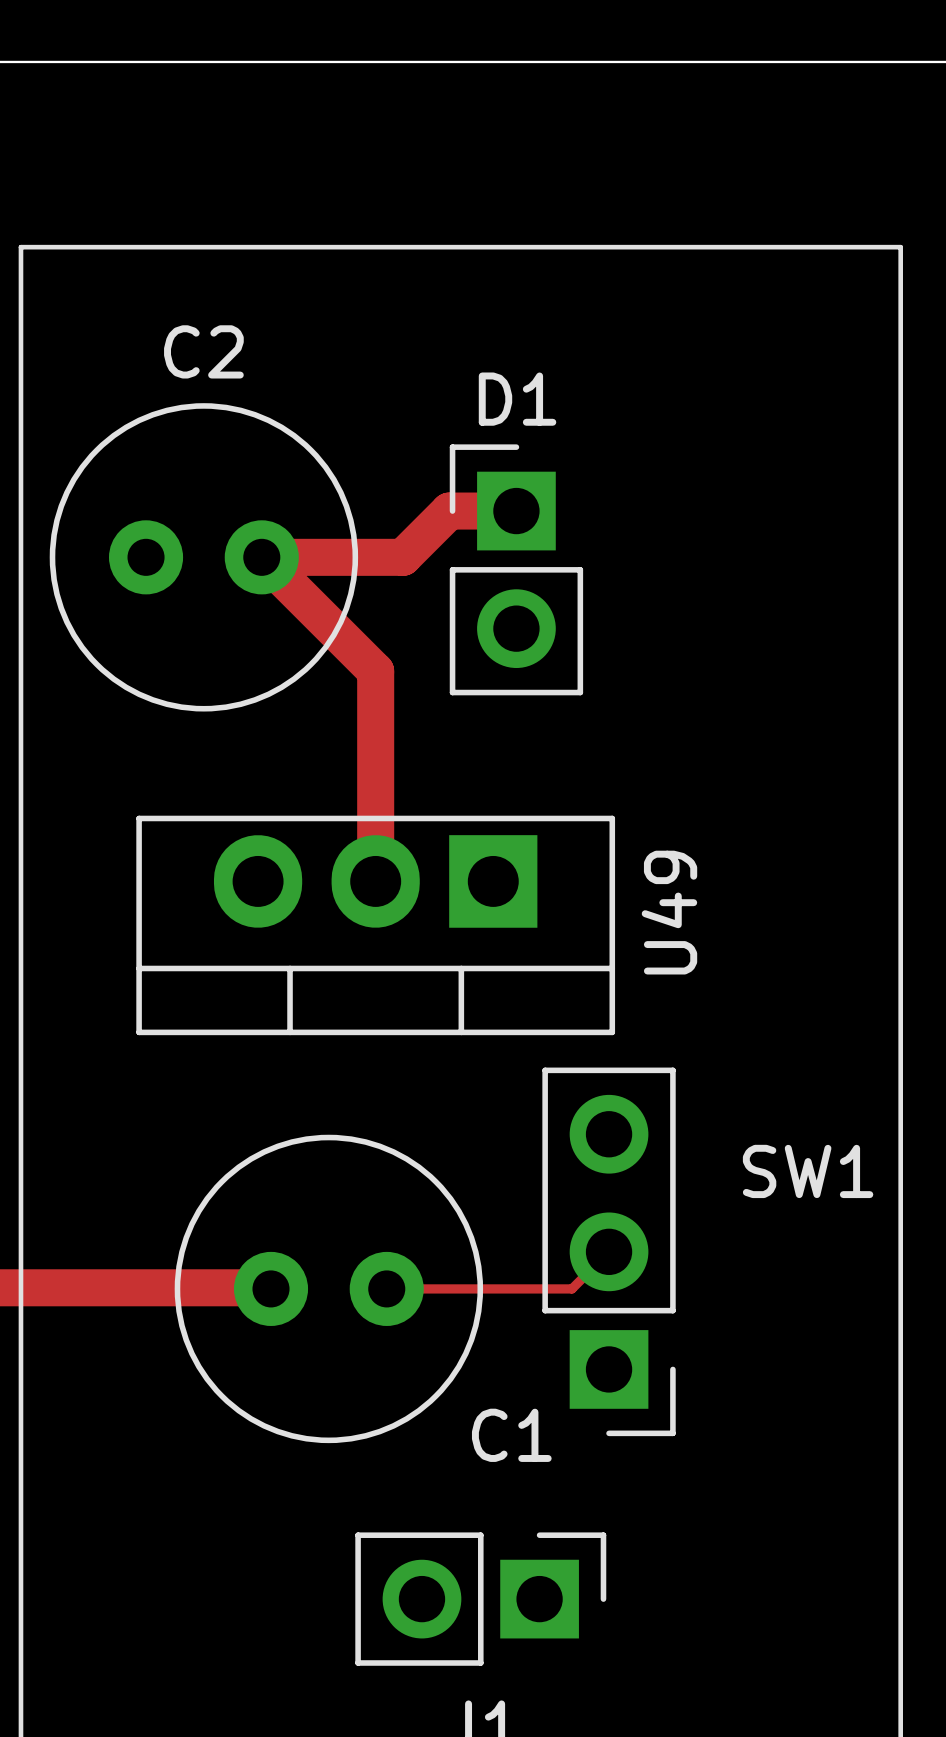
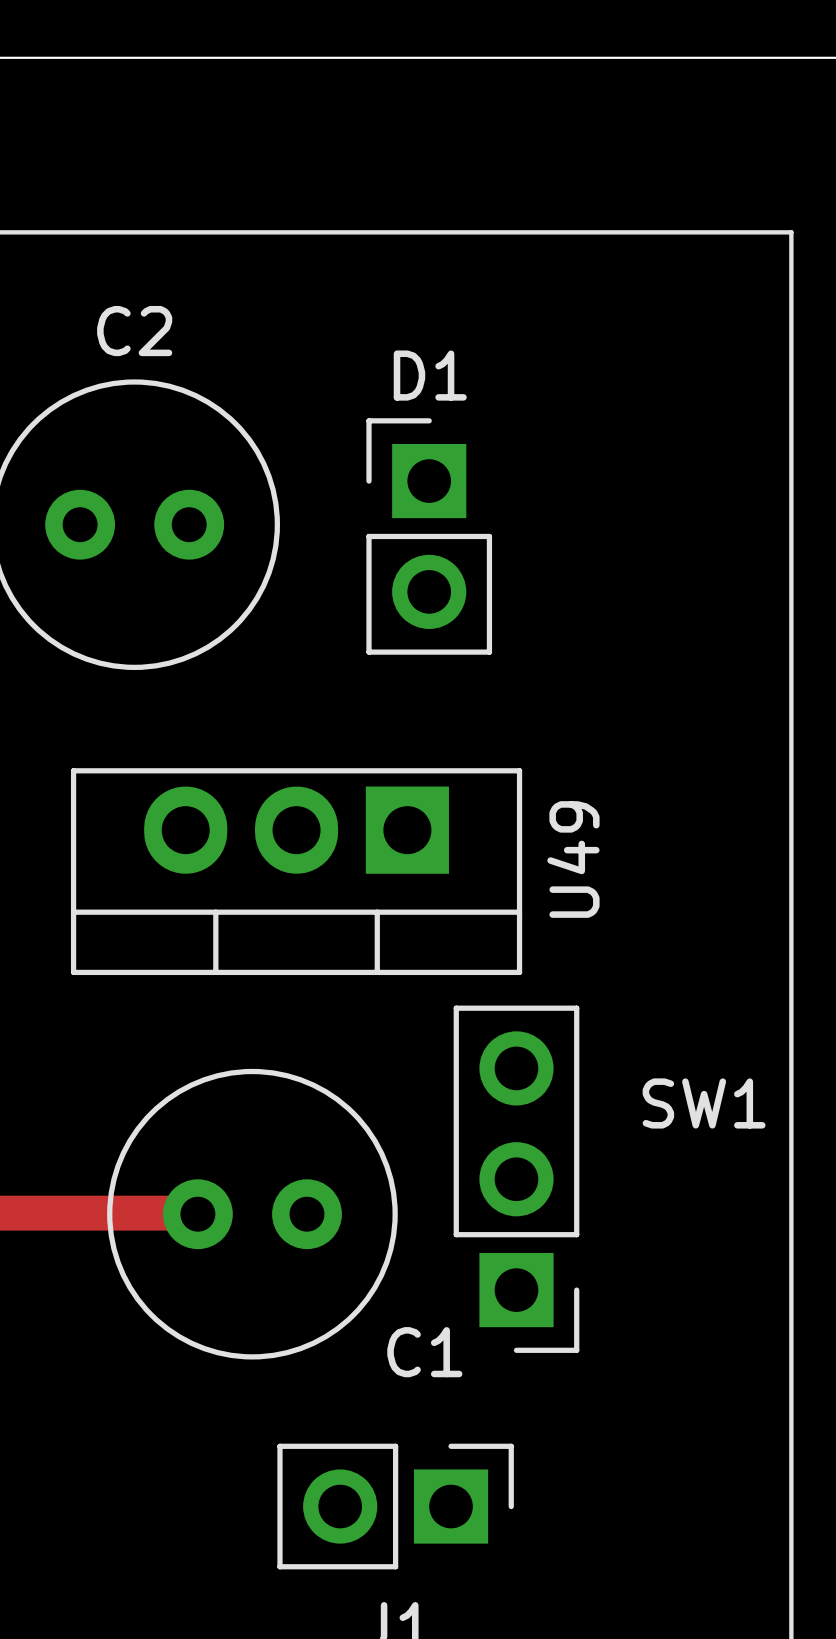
track: (516, 511) (449, 511) (402, 557) (261, 557) (375, 671) (375, 881) -> none
track: (609, 1251) (571, 1288) (386, 1288) -> none

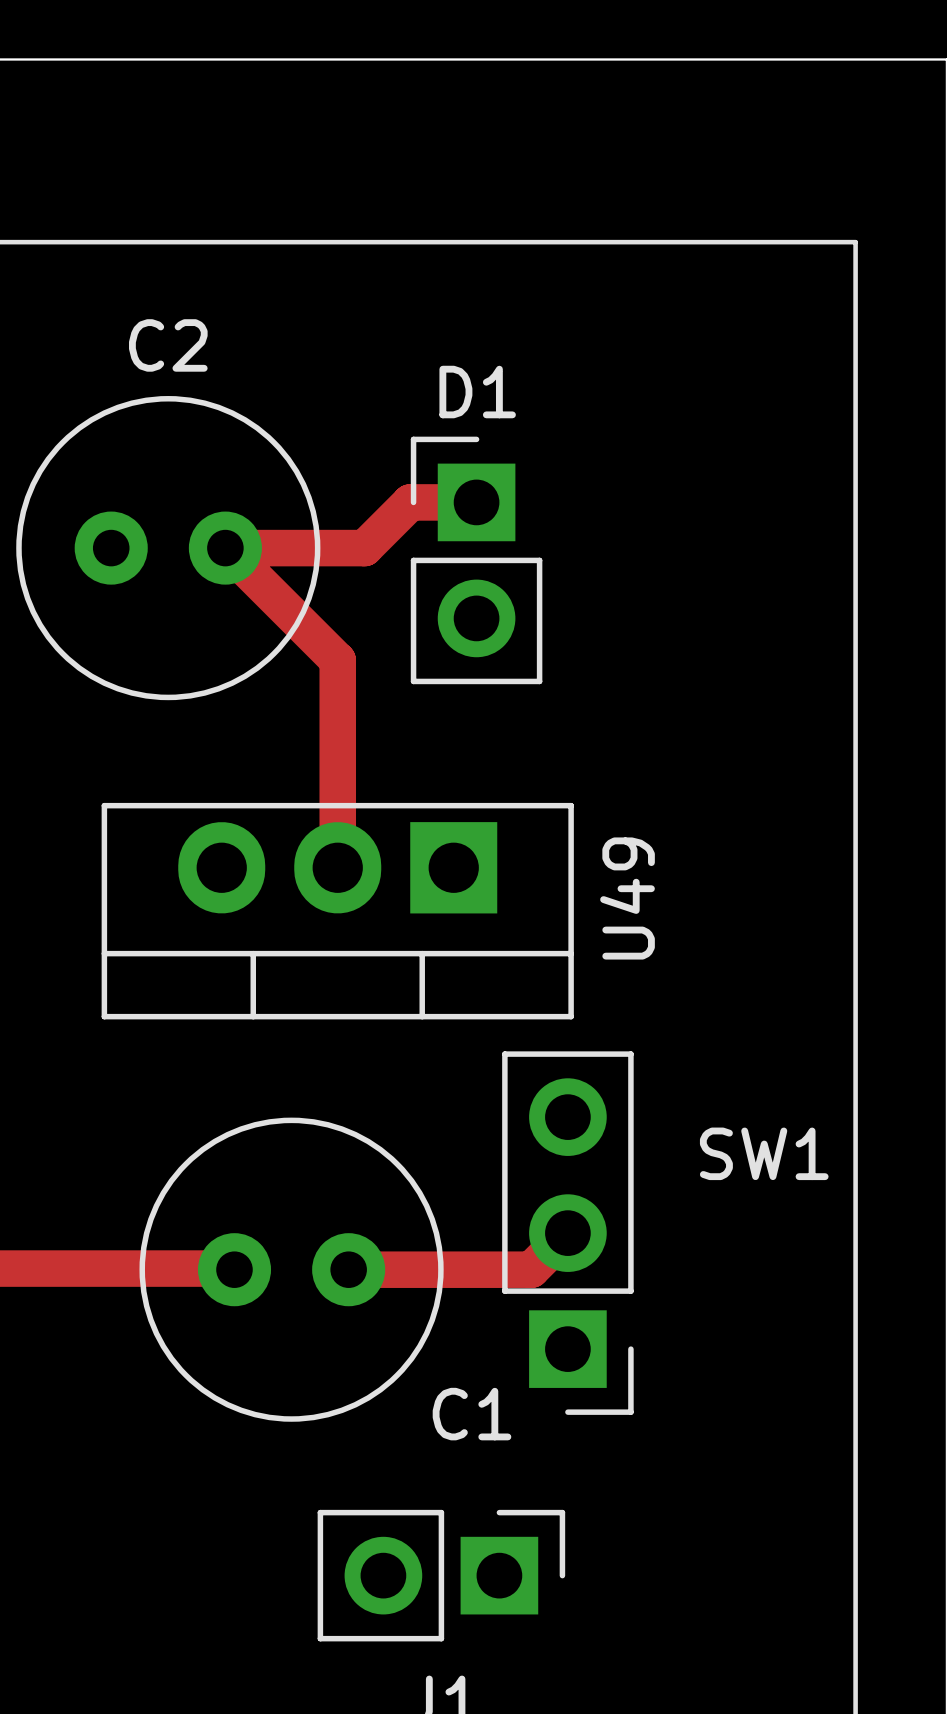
track: none -> (476, 502) (410, 502) (364, 548) (225, 548) (337, 660) (337, 867)
track: none -> (567, 1233) (531, 1269) (348, 1269)

